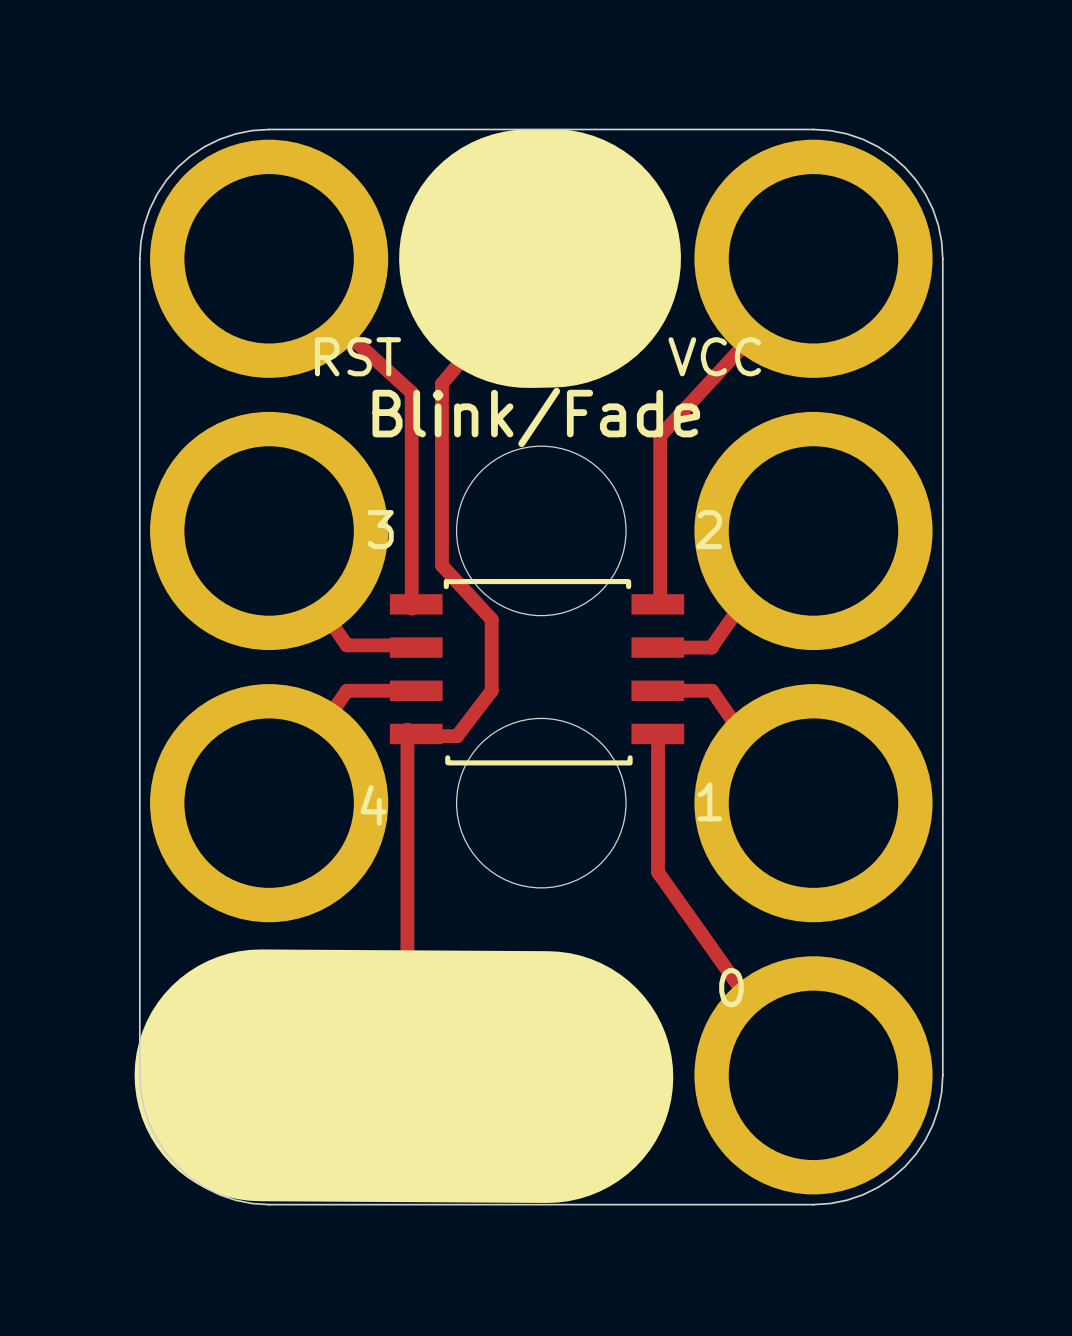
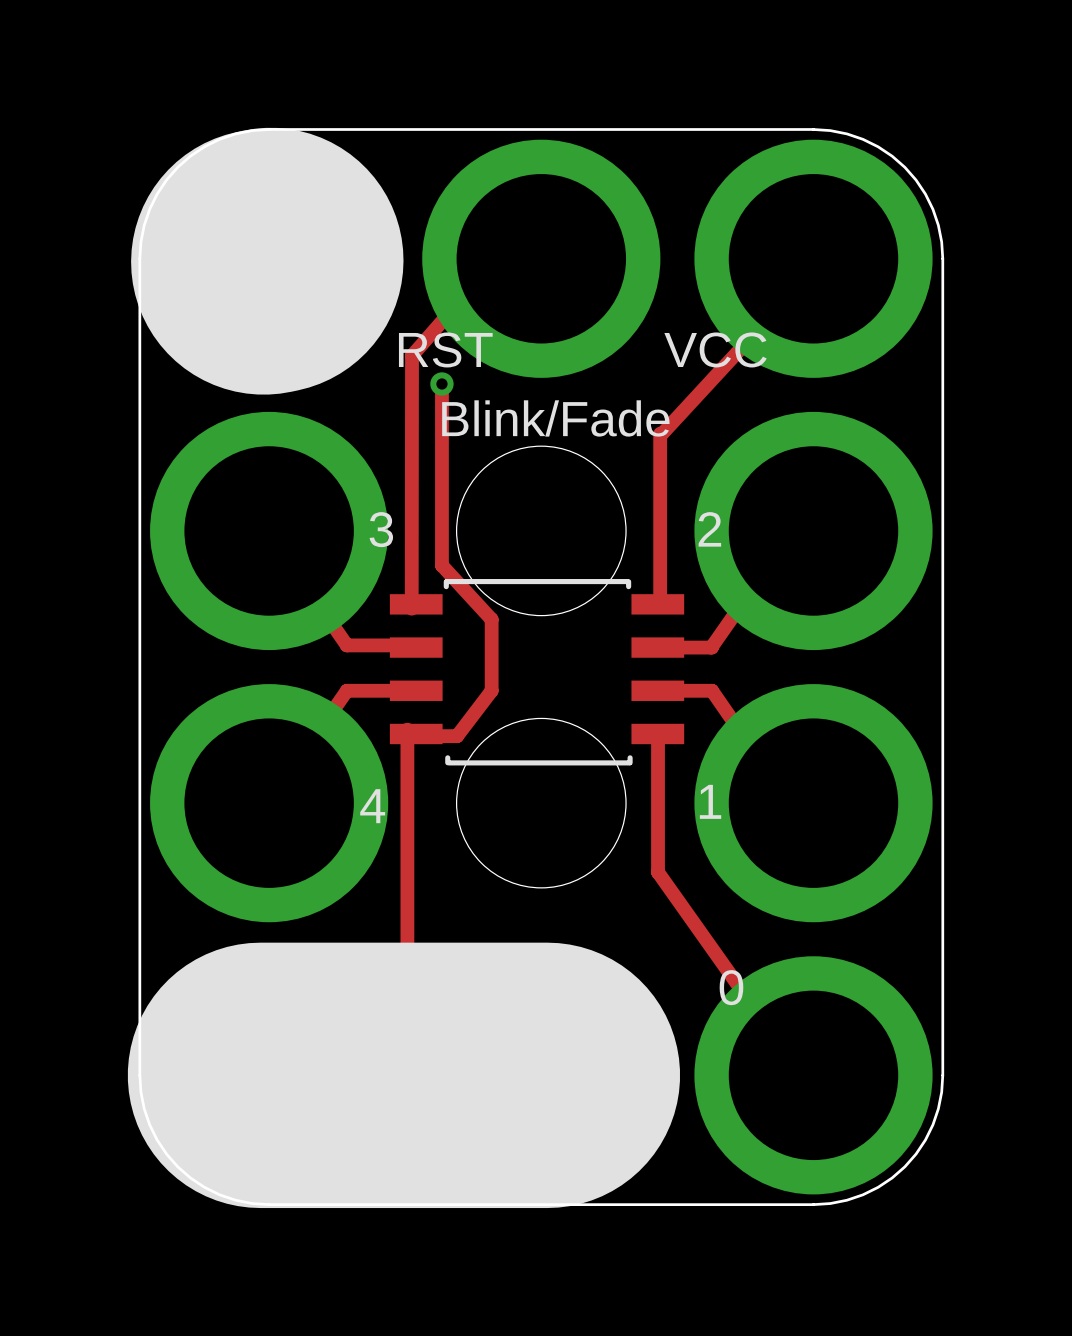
part footprint: [134, 128, 944, 1206] -> [127, 127, 945, 1209]

